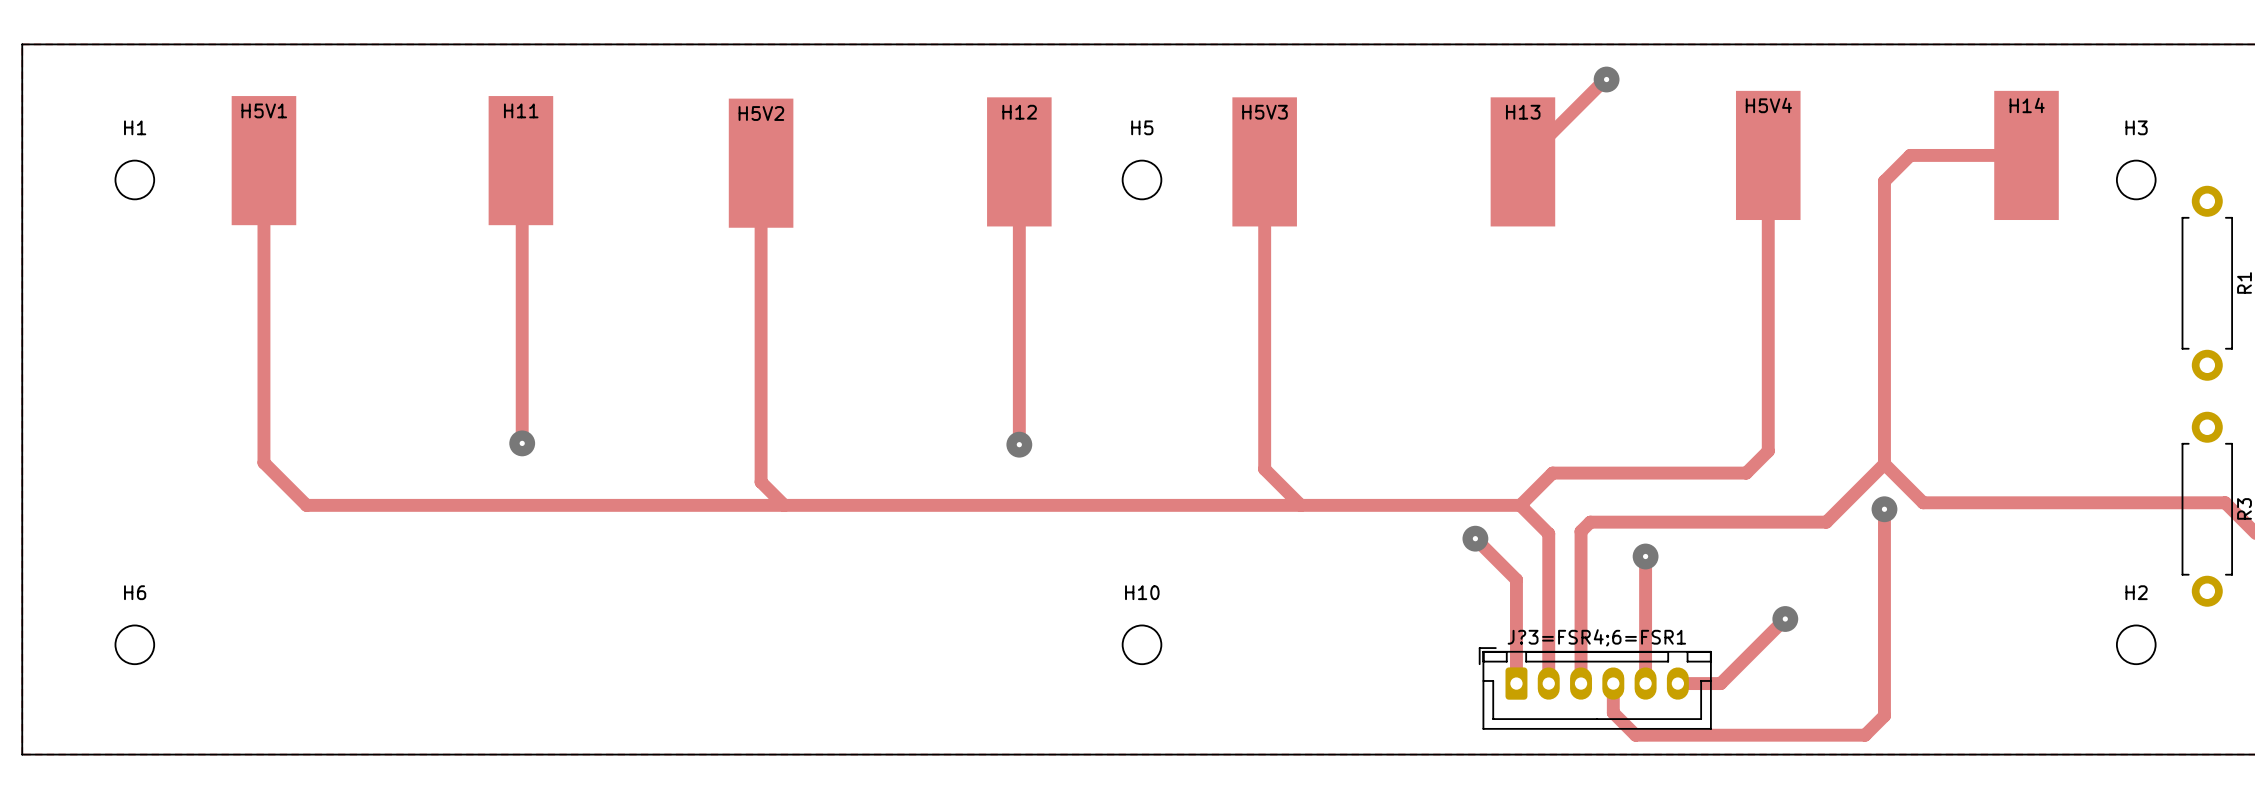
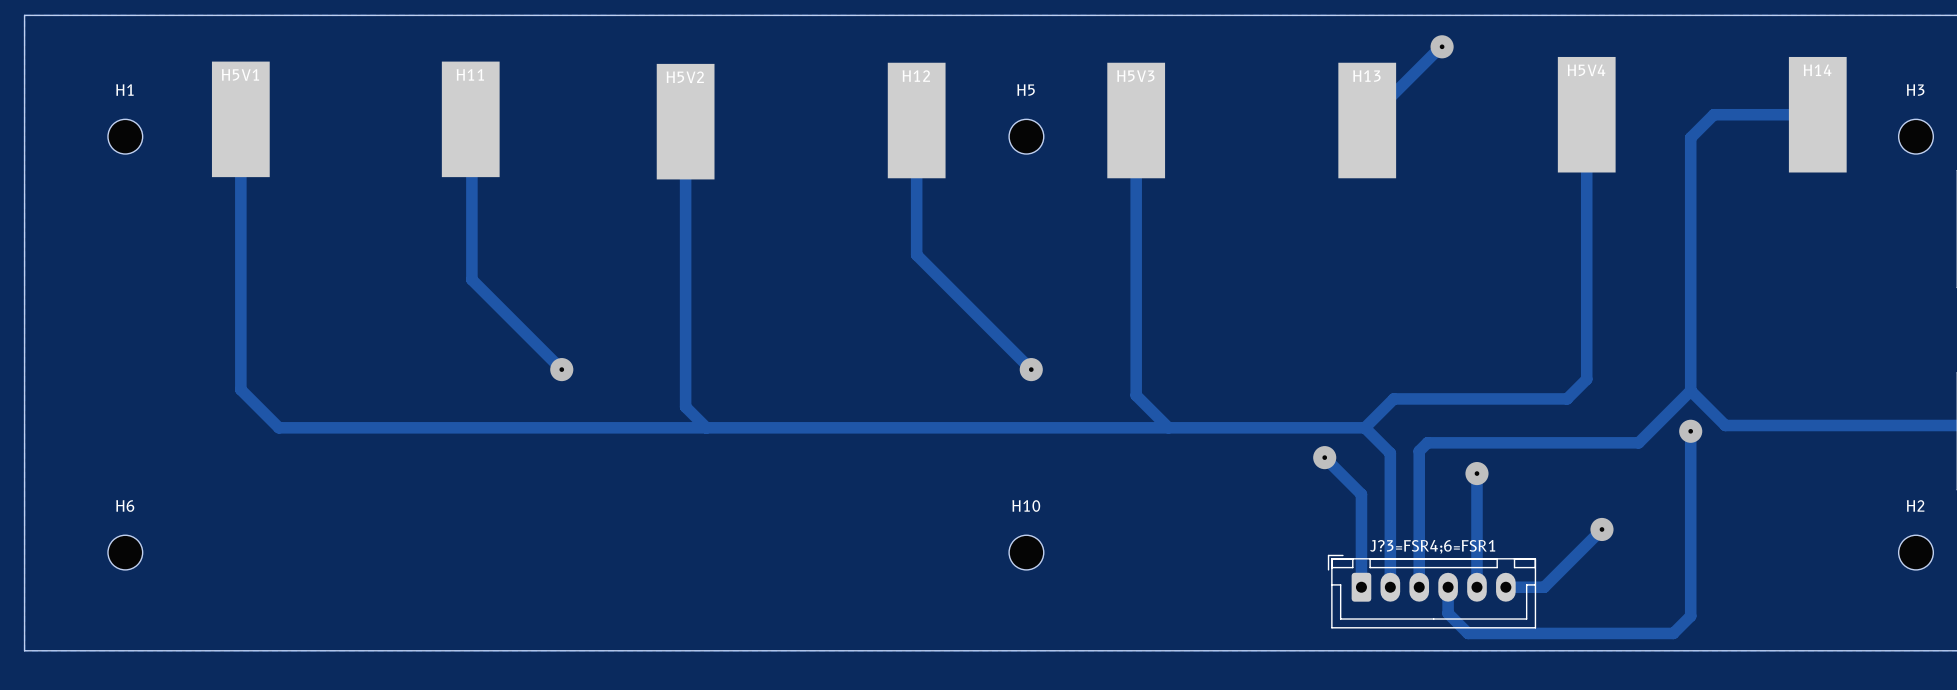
track: (1019, 312) (1019, 444) -> (916, 254) (1031, 369)
track: (522, 339) (522, 443) -> (471, 279) (561, 369)
via: none -> (561, 369)
via: none -> (1031, 369)
via: (522, 443) -> none
via: (1019, 444) -> none

